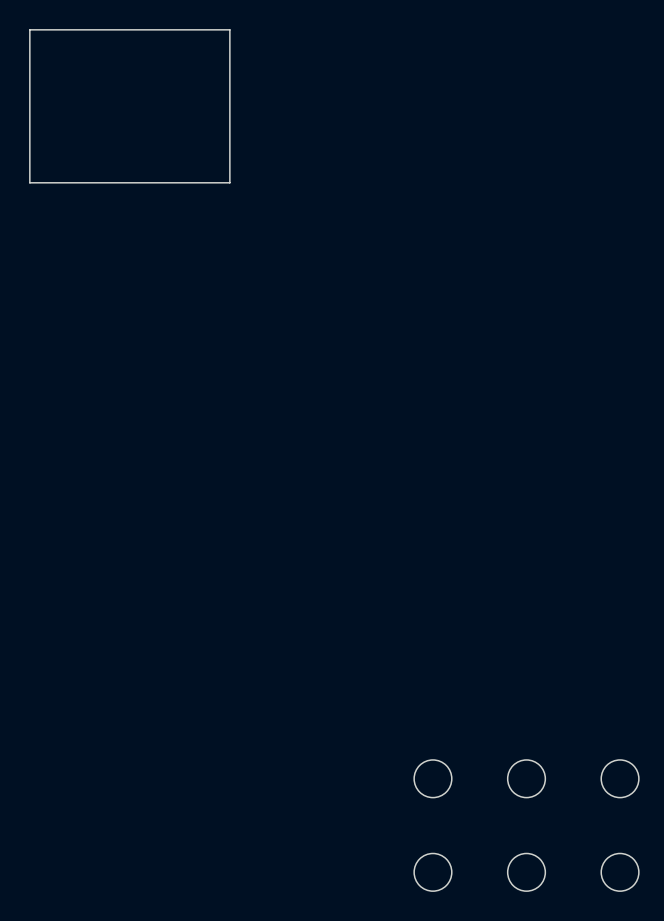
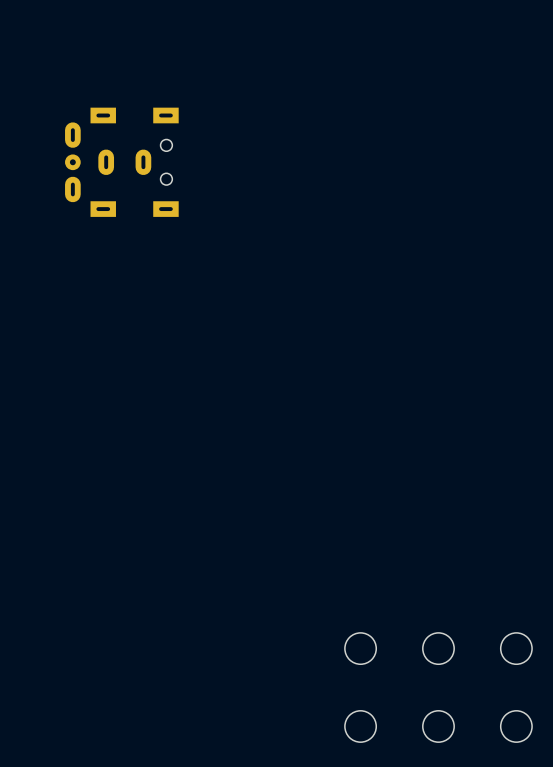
board edge: (229, 29) (29, 29) (29, 182) (229, 182) (229, 29) -> none
part: none -> (121, 162)

